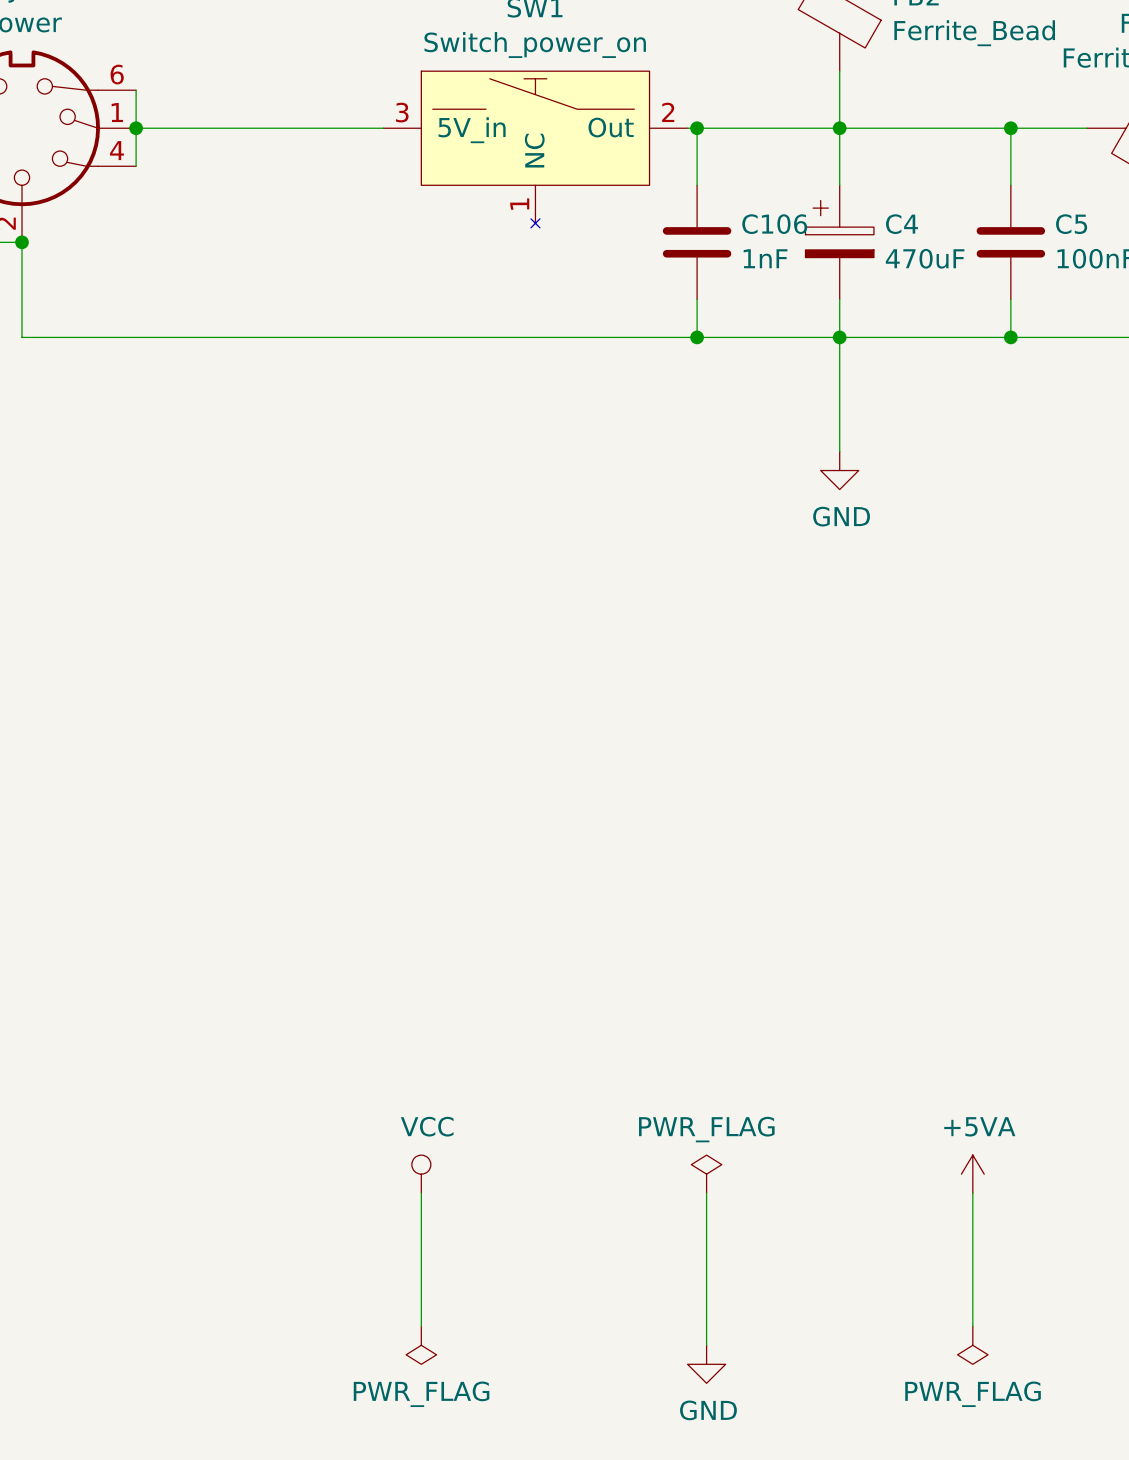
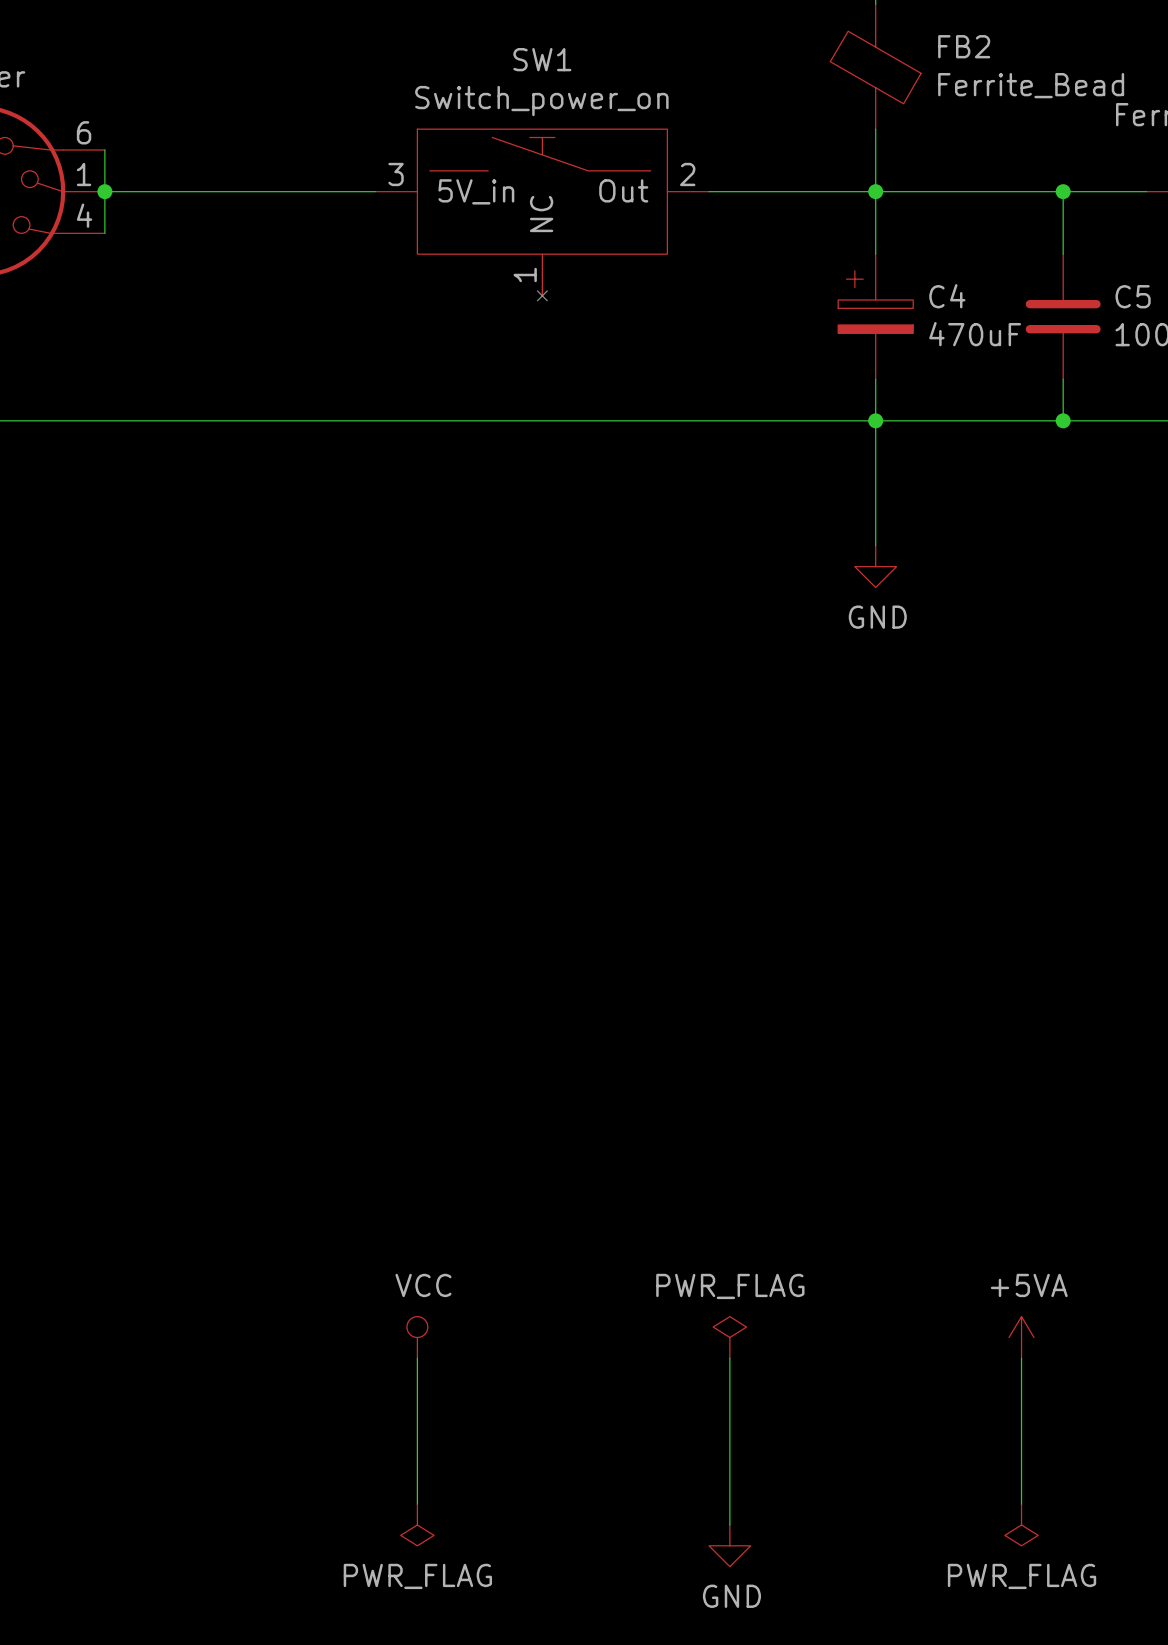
wire: (697, 128) (697, 185) -> none
junction: (697, 128) -> none
C106: 1nF (697, 242) -> none
wire: (697, 299) (697, 337) -> none
junction: (697, 337) -> none

